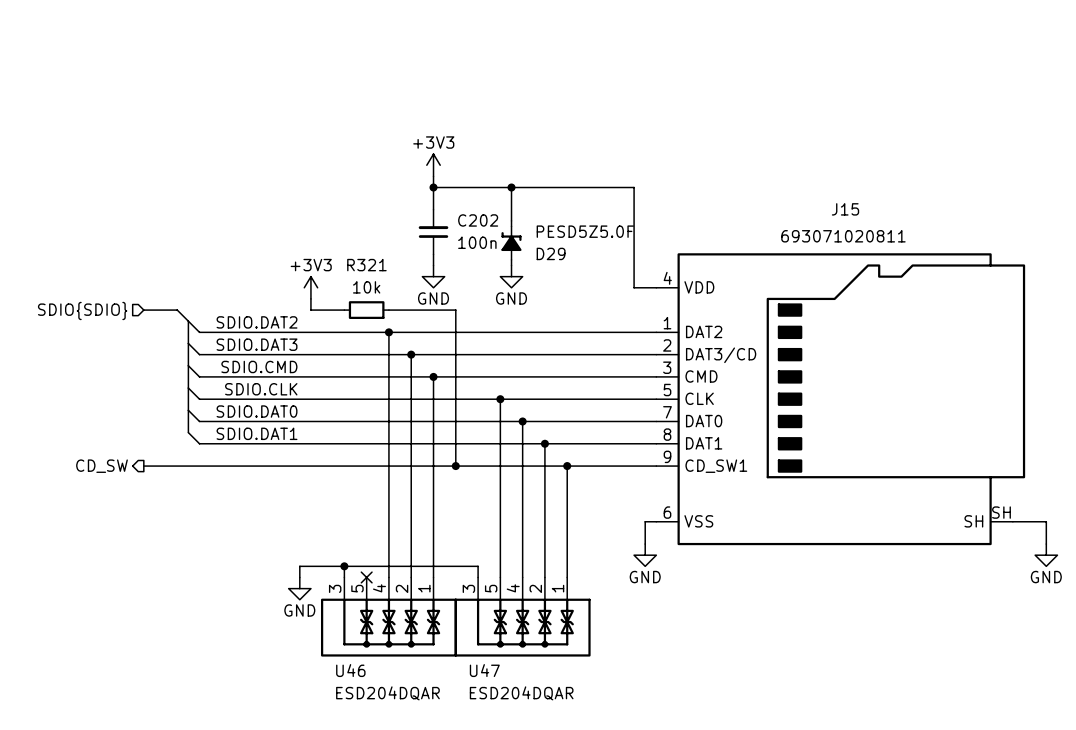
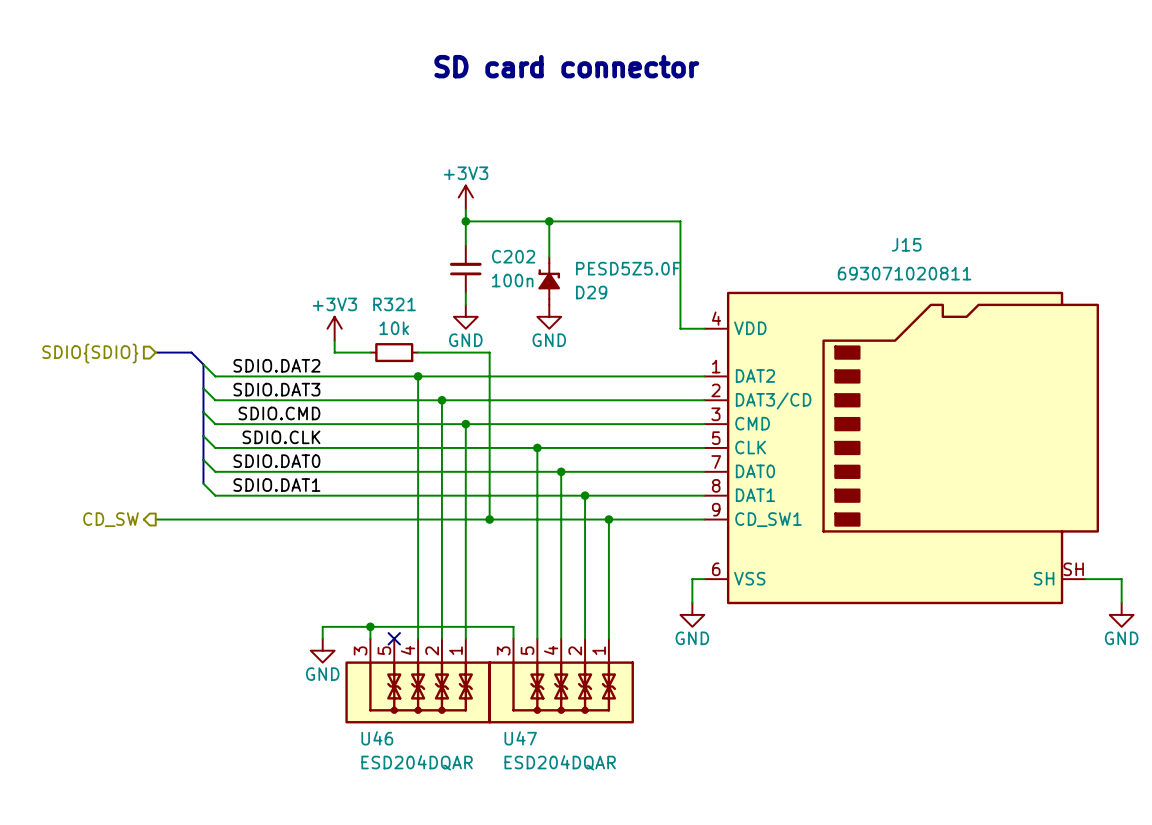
text: none -> SD card connector (566, 66)

